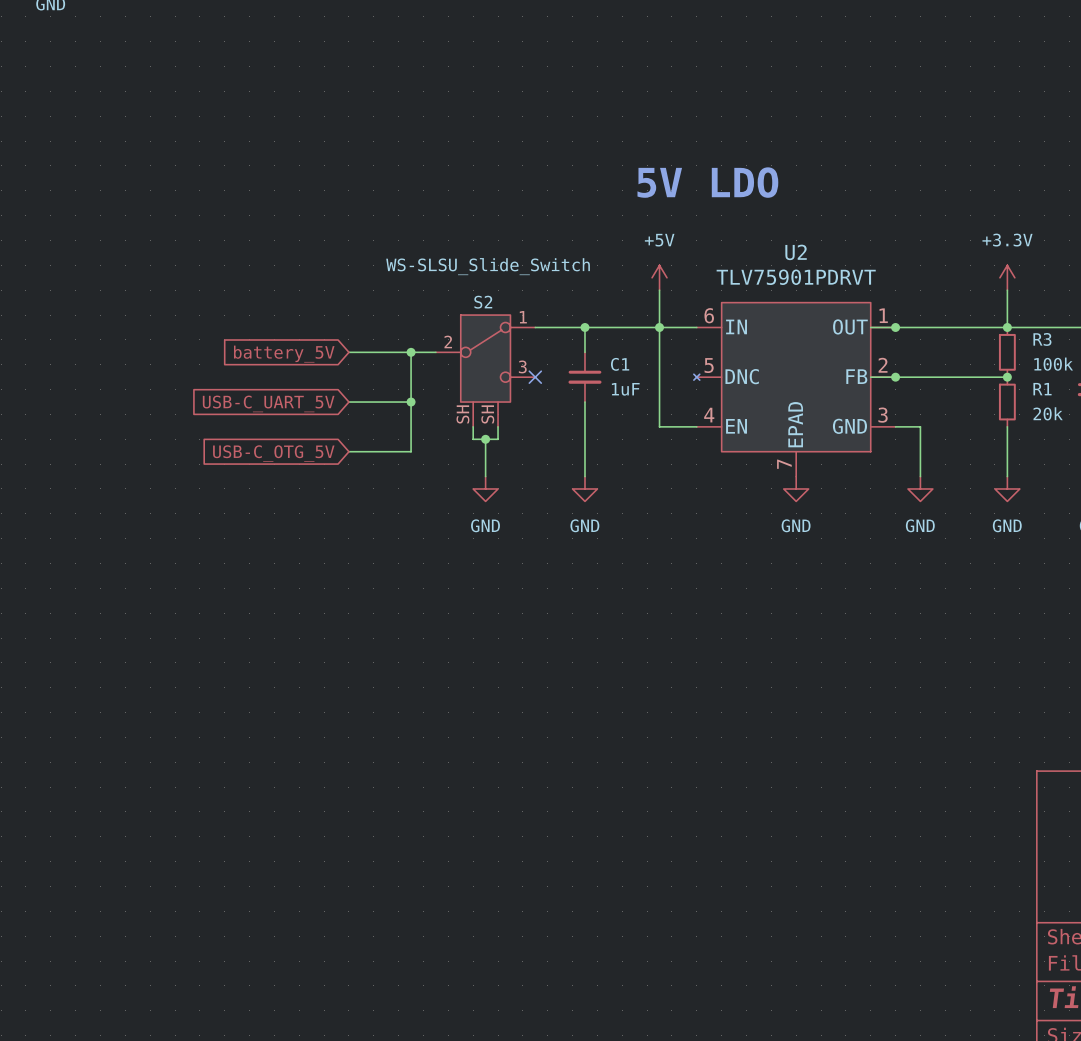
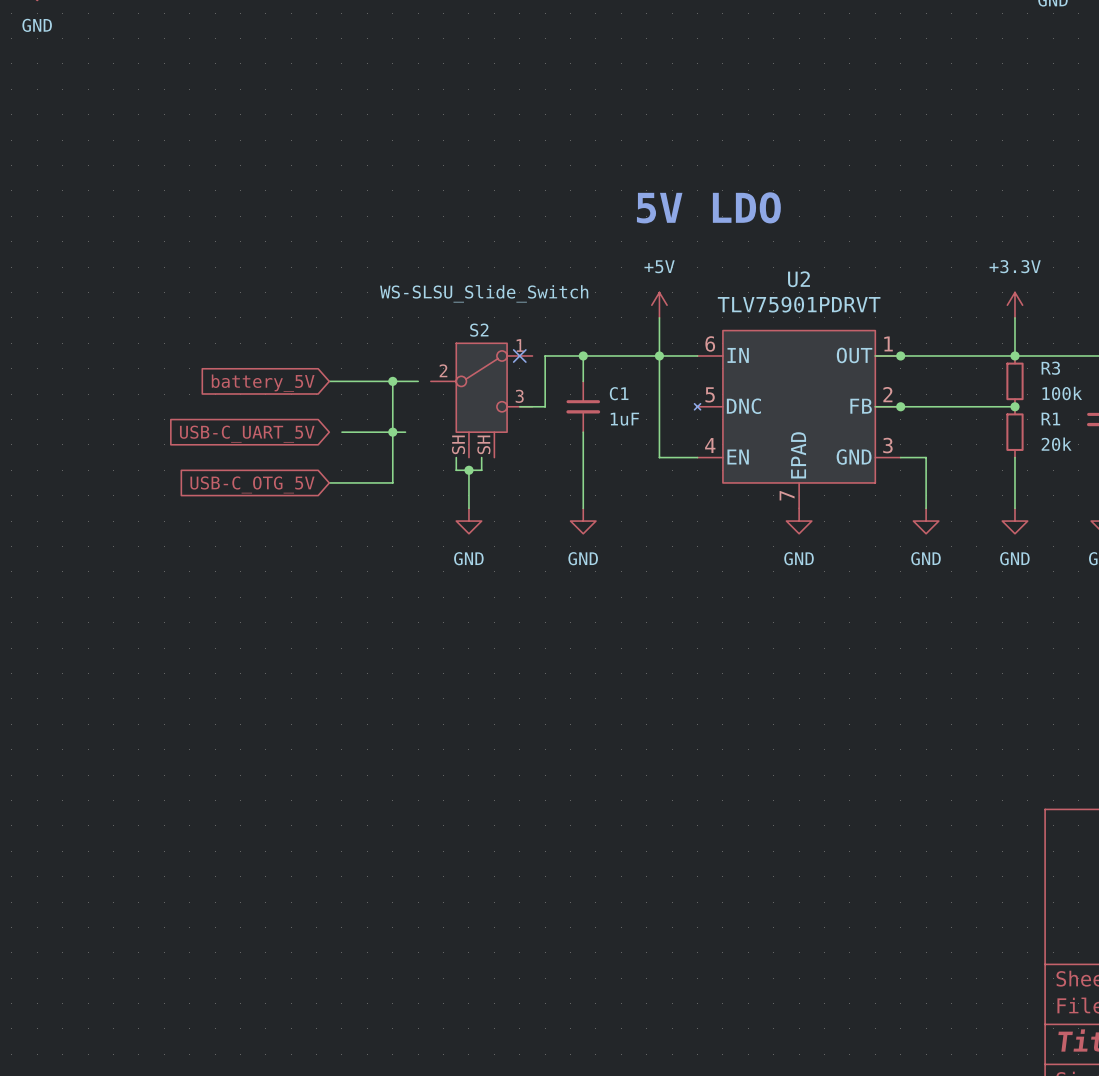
wire: (535, 327) (547, 327) -> (519, 406) (545, 406) (545, 355)
wire: (411, 352) (411, 451) (398, 451) -> (392, 381) (392, 482)
junction position: (411, 352) -> (392, 381)
wire: (423, 352) (435, 352) -> (329, 381) (341, 381)
global label position: battery_5V (284, 354) -> battery_5V (263, 383)
no-connect mark position: (535, 377) -> (519, 355)
junction position: (411, 402) -> (392, 432)
global label position: USB-C_UART_5V (268, 403) -> USB-C_UART_5V (247, 434)
wire: none -> (456, 457) (456, 470) (468, 470) (468, 508)
wire: (473, 426) (473, 439) -> (481, 457) (481, 470)
wire: (498, 426) (498, 439) (485, 439) (485, 476) -> none
junction position: (485, 439) -> (468, 470)
wire: none -> (329, 482) (341, 482)
global label position: USB-C_OTG_5V (273, 453) -> USB-C_OTG_5V (252, 484)
power symbol position: GND (485, 488) -> GND (468, 521)

